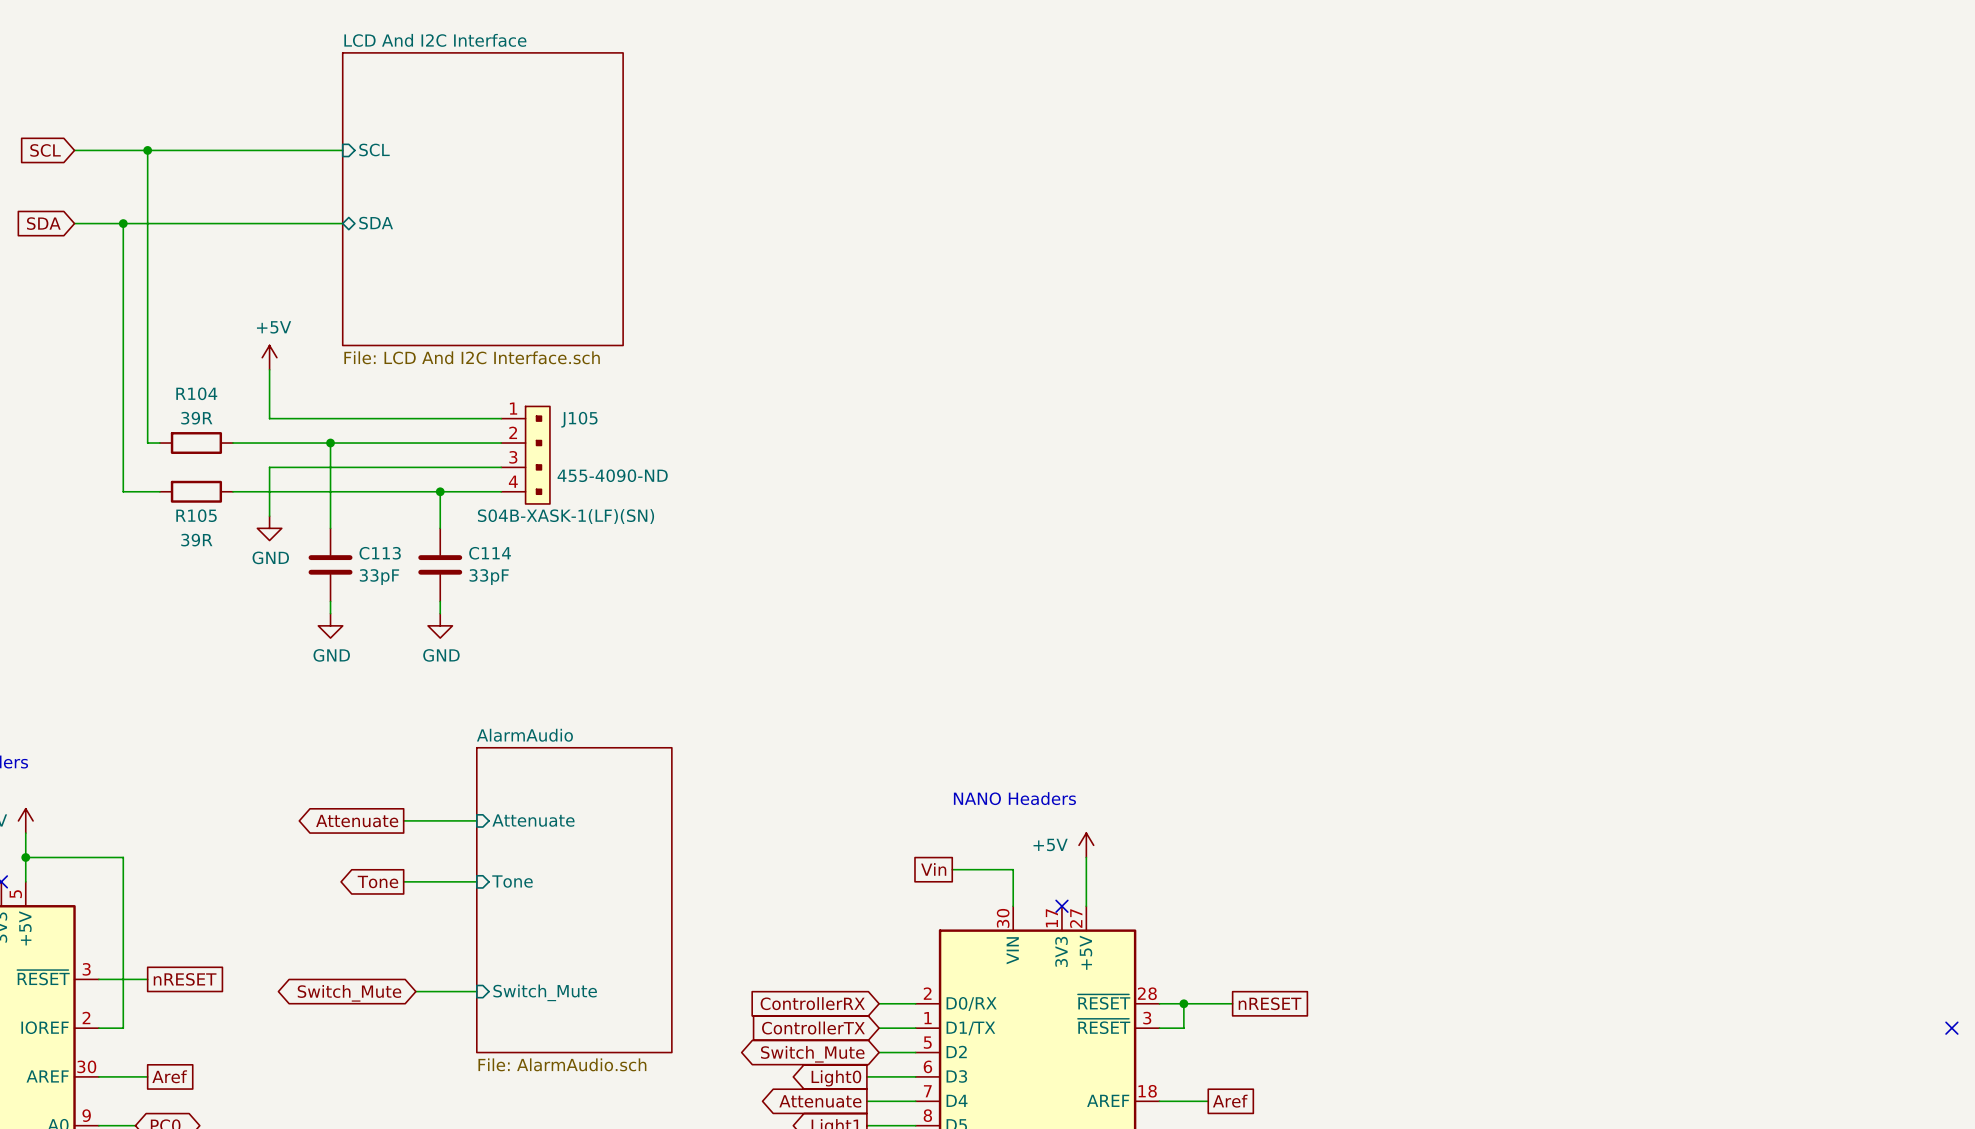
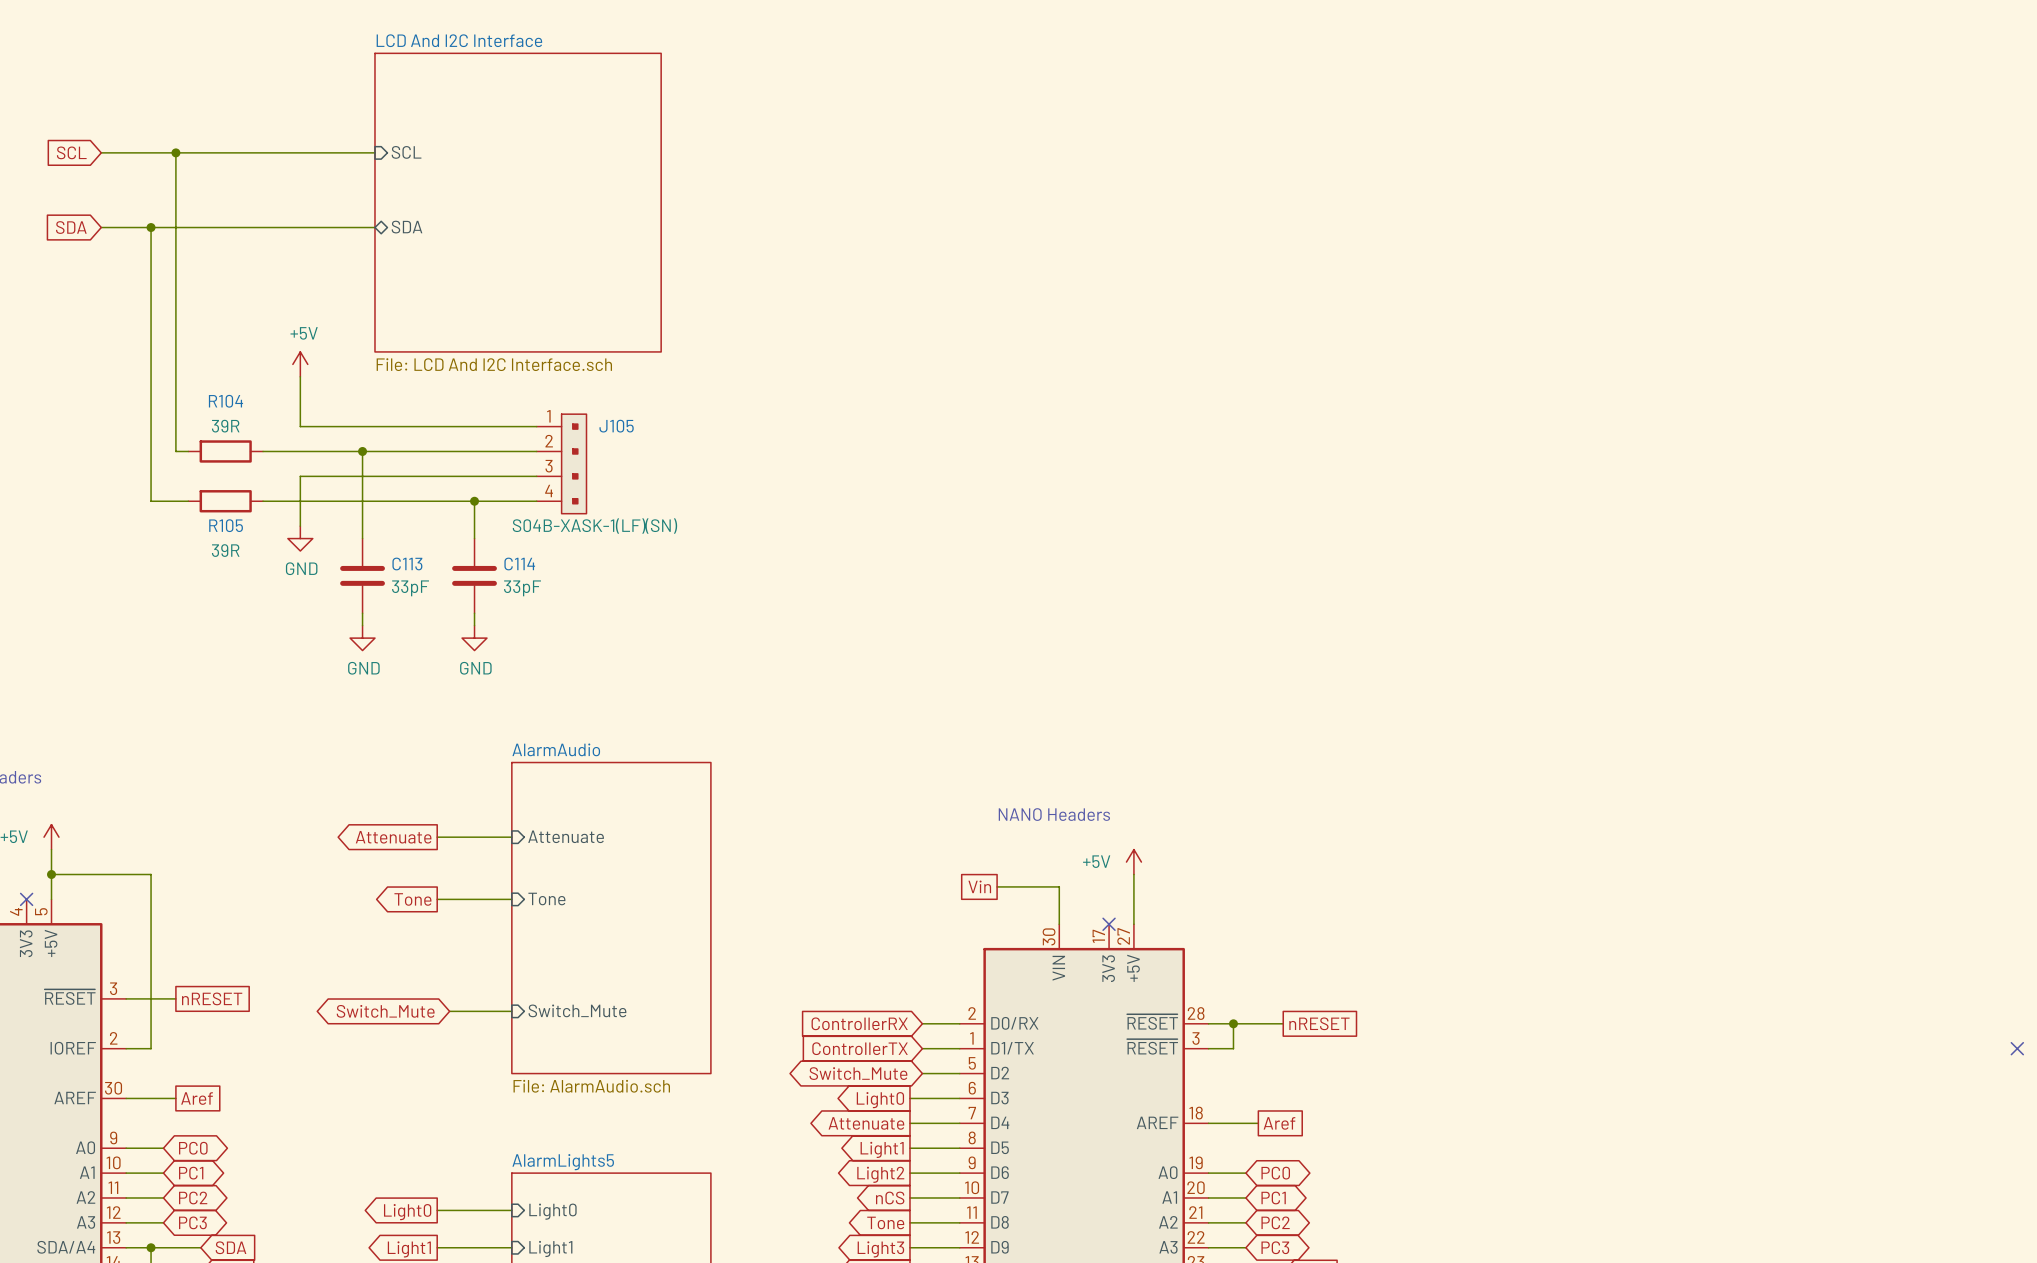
J105 text: 455-4090-ND (612, 475) -> none

